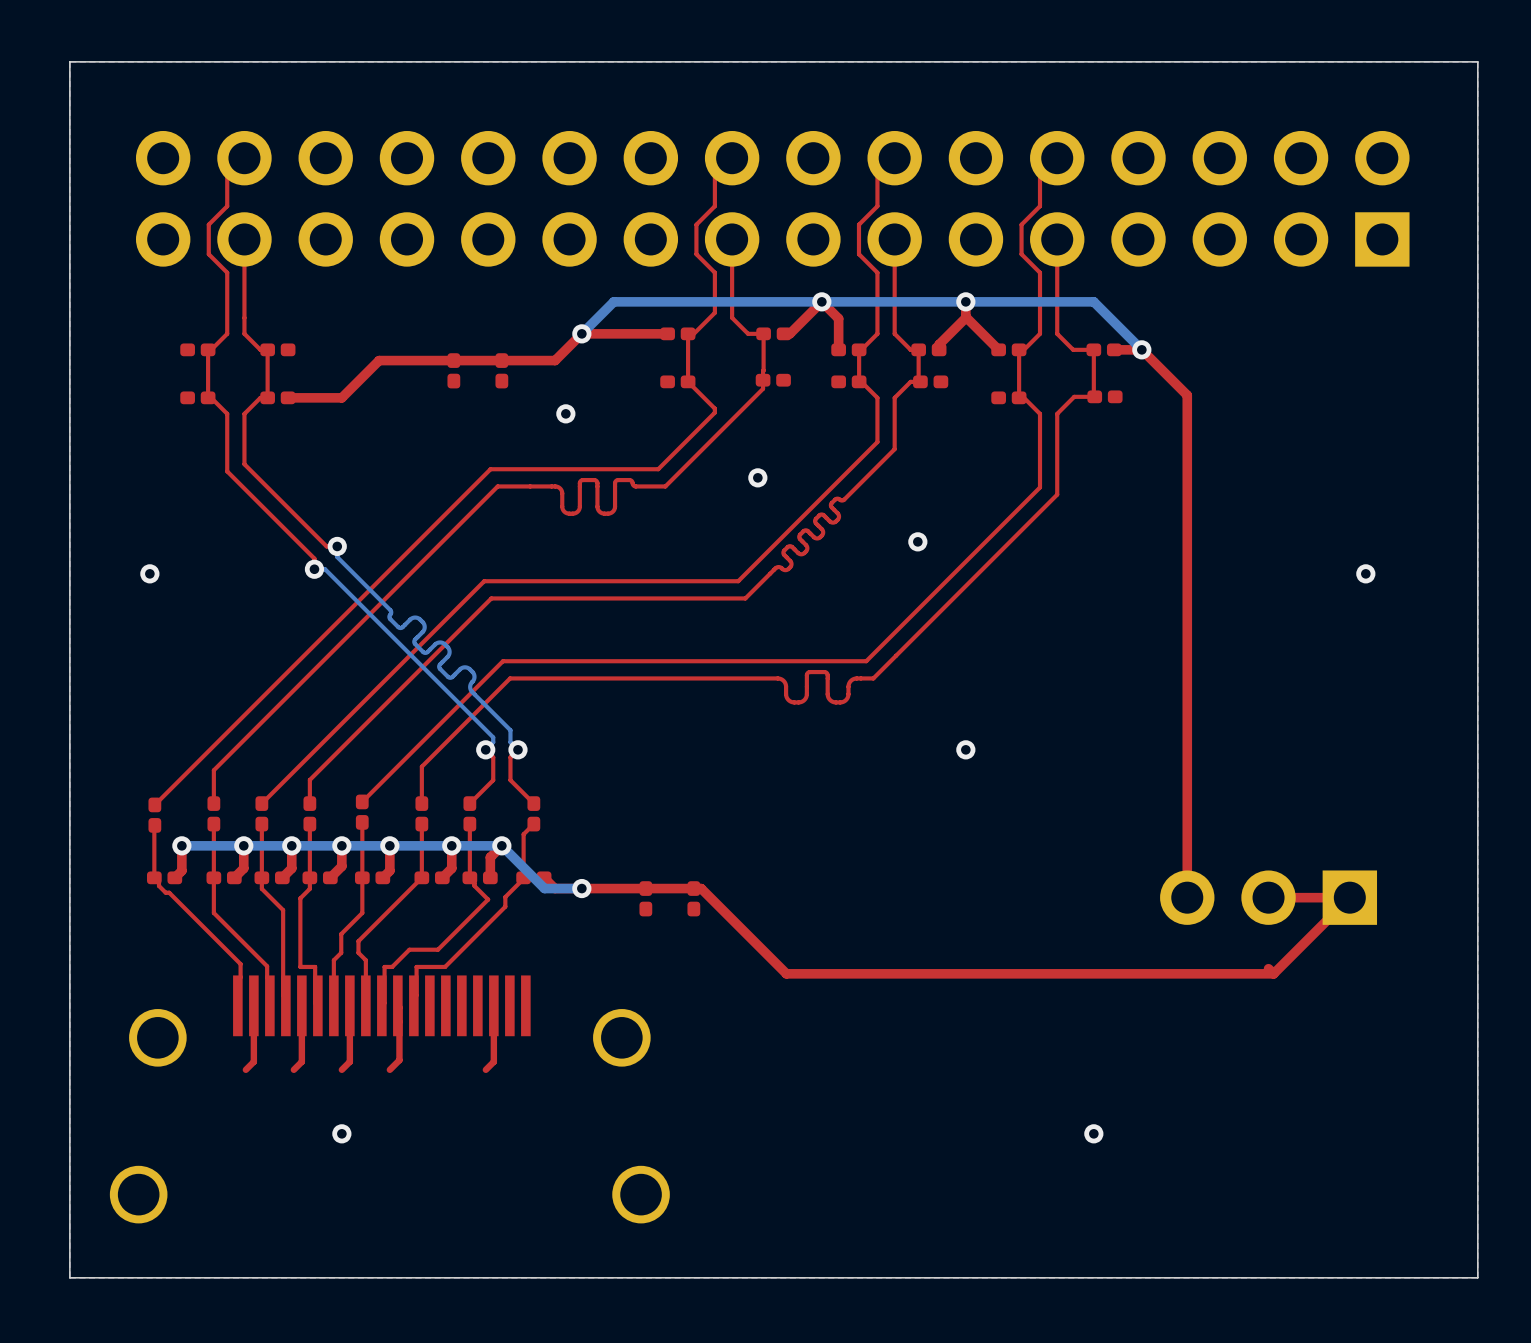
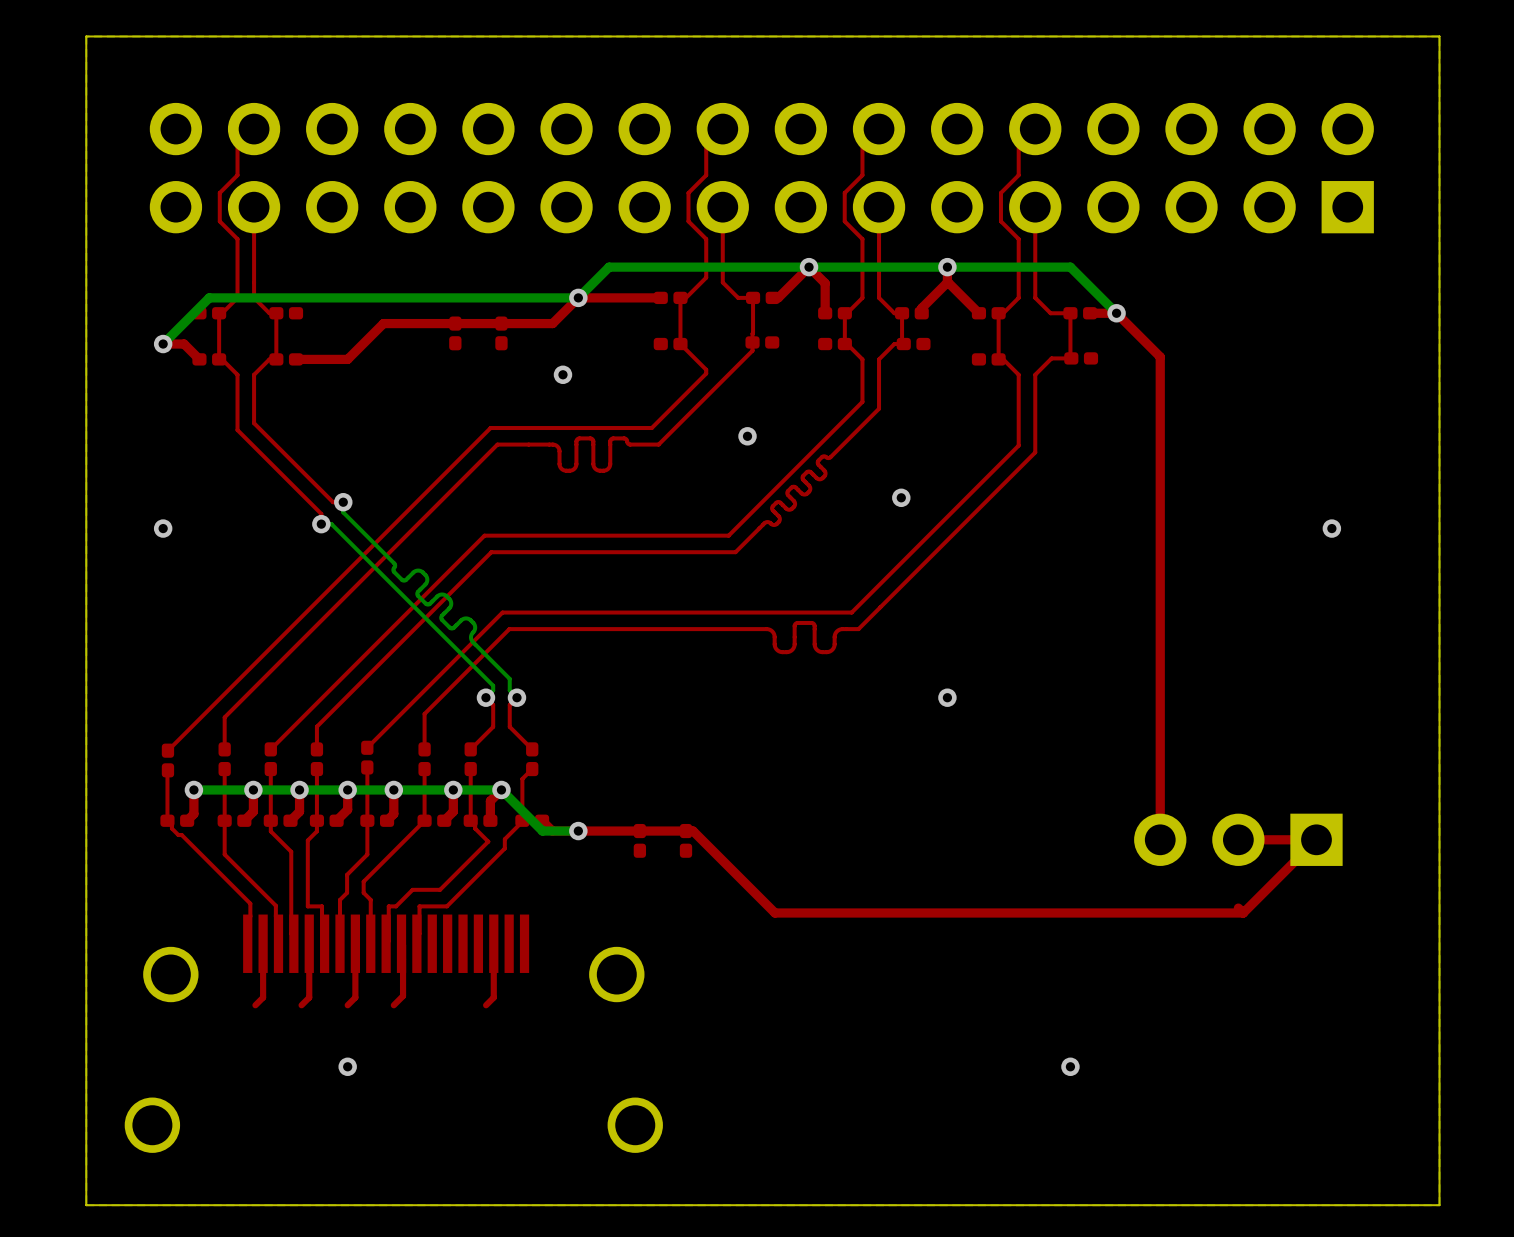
bottom track: none -> (578, 297) (209, 297) (163, 344)
top track: none -> (163, 344) (184, 344) (199, 359)
via: none -> (163, 344)

